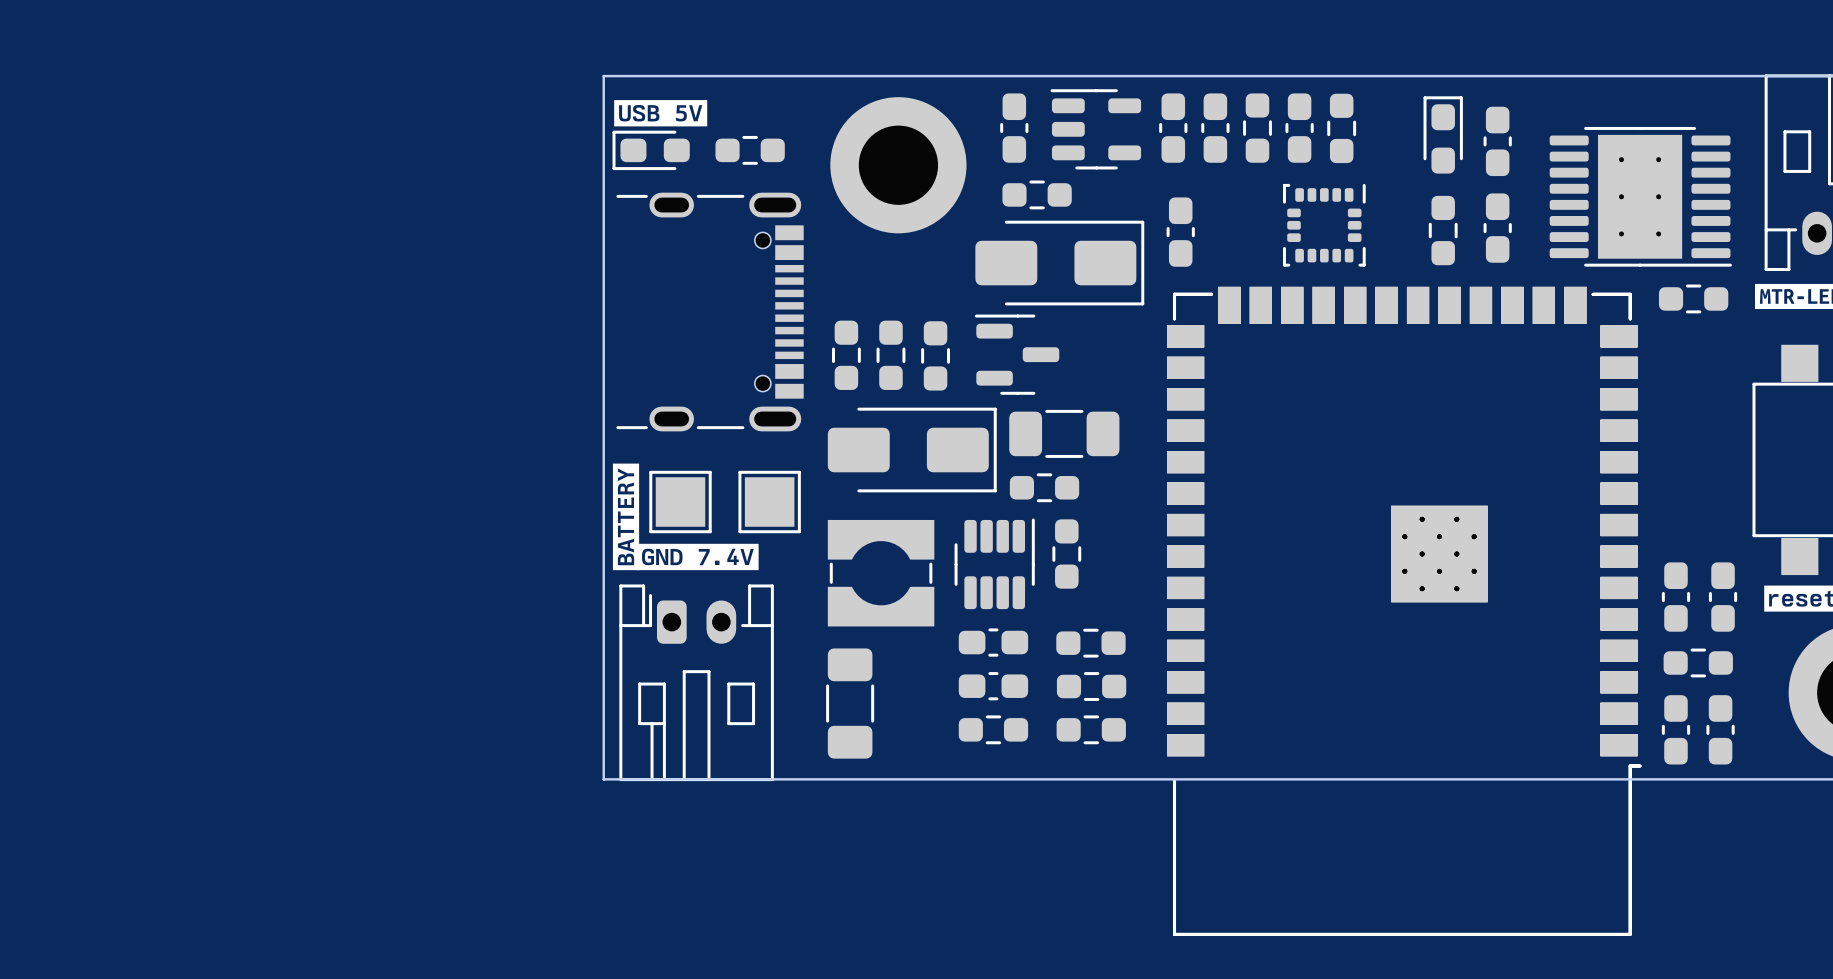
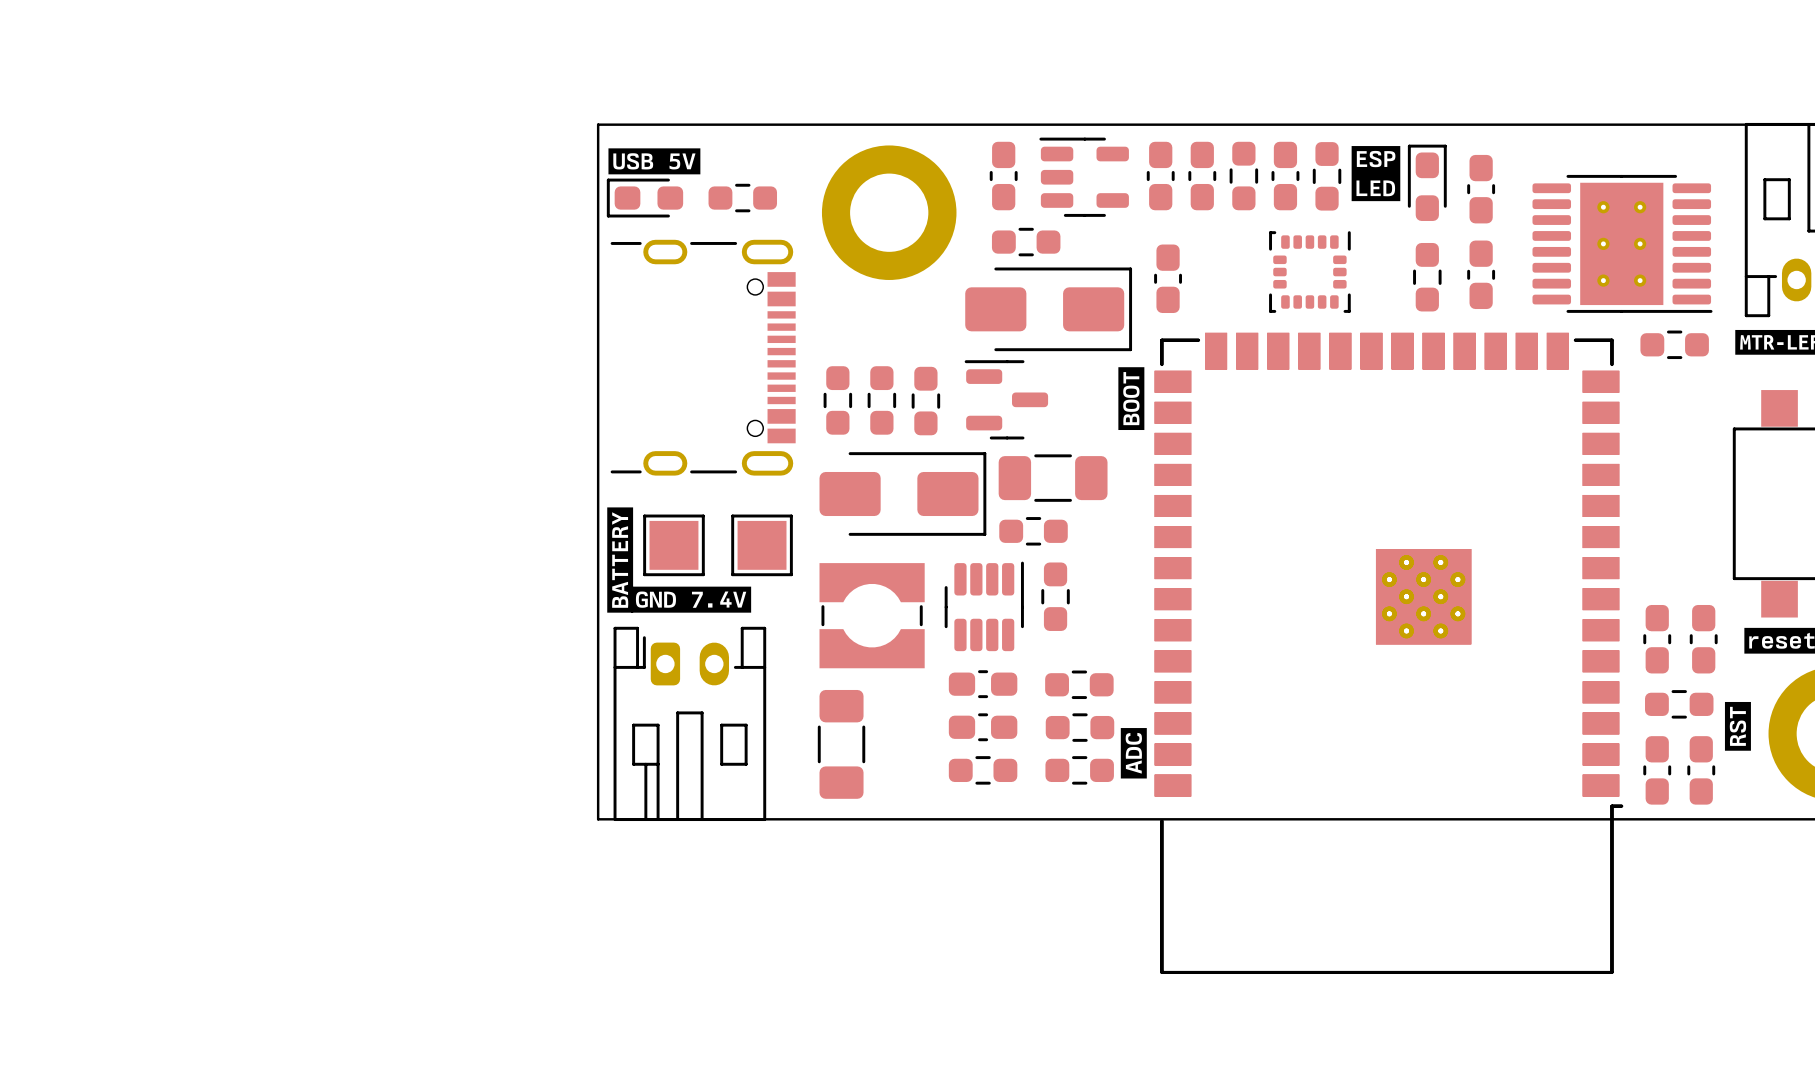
drawing: none -> [1351, 146, 1401, 202]
drawing: none -> [1118, 367, 1145, 431]
drawing: none -> [1724, 701, 1751, 751]
drawing: none -> [1120, 728, 1147, 779]

